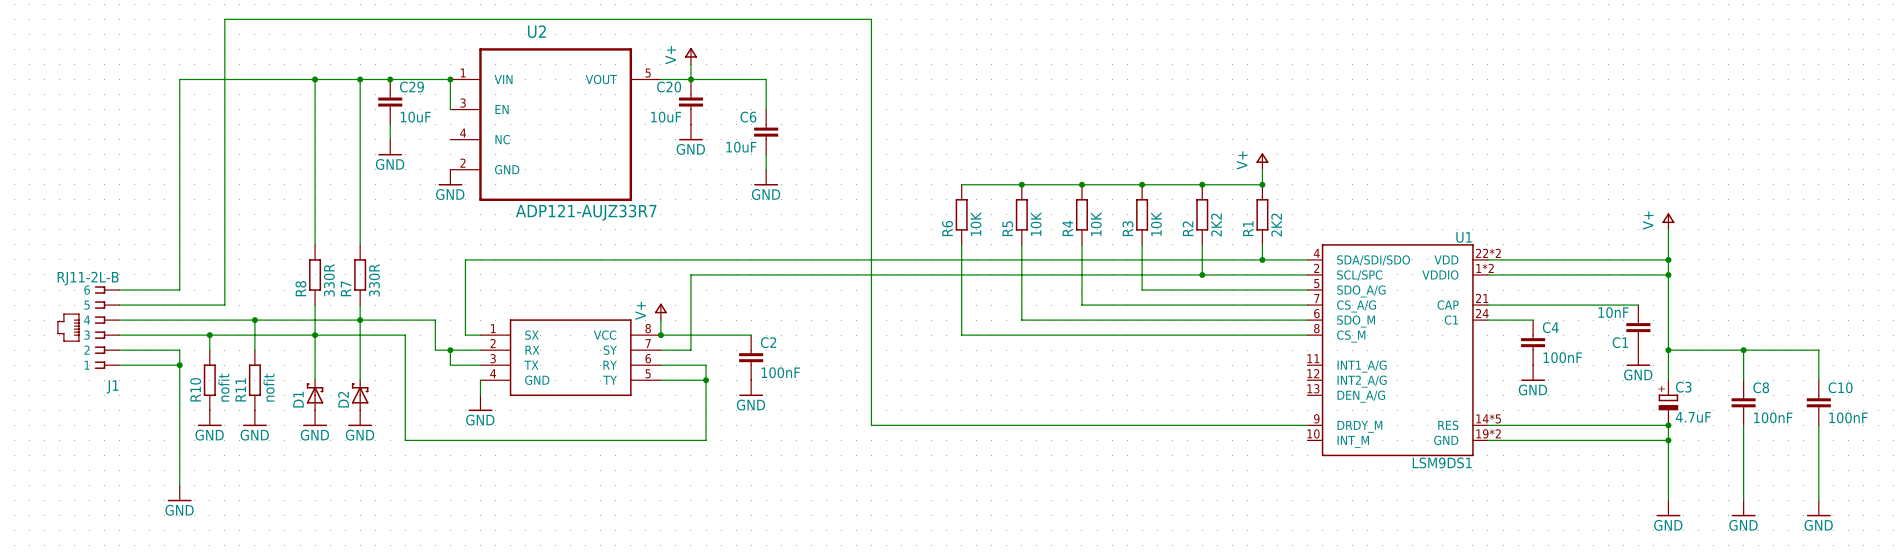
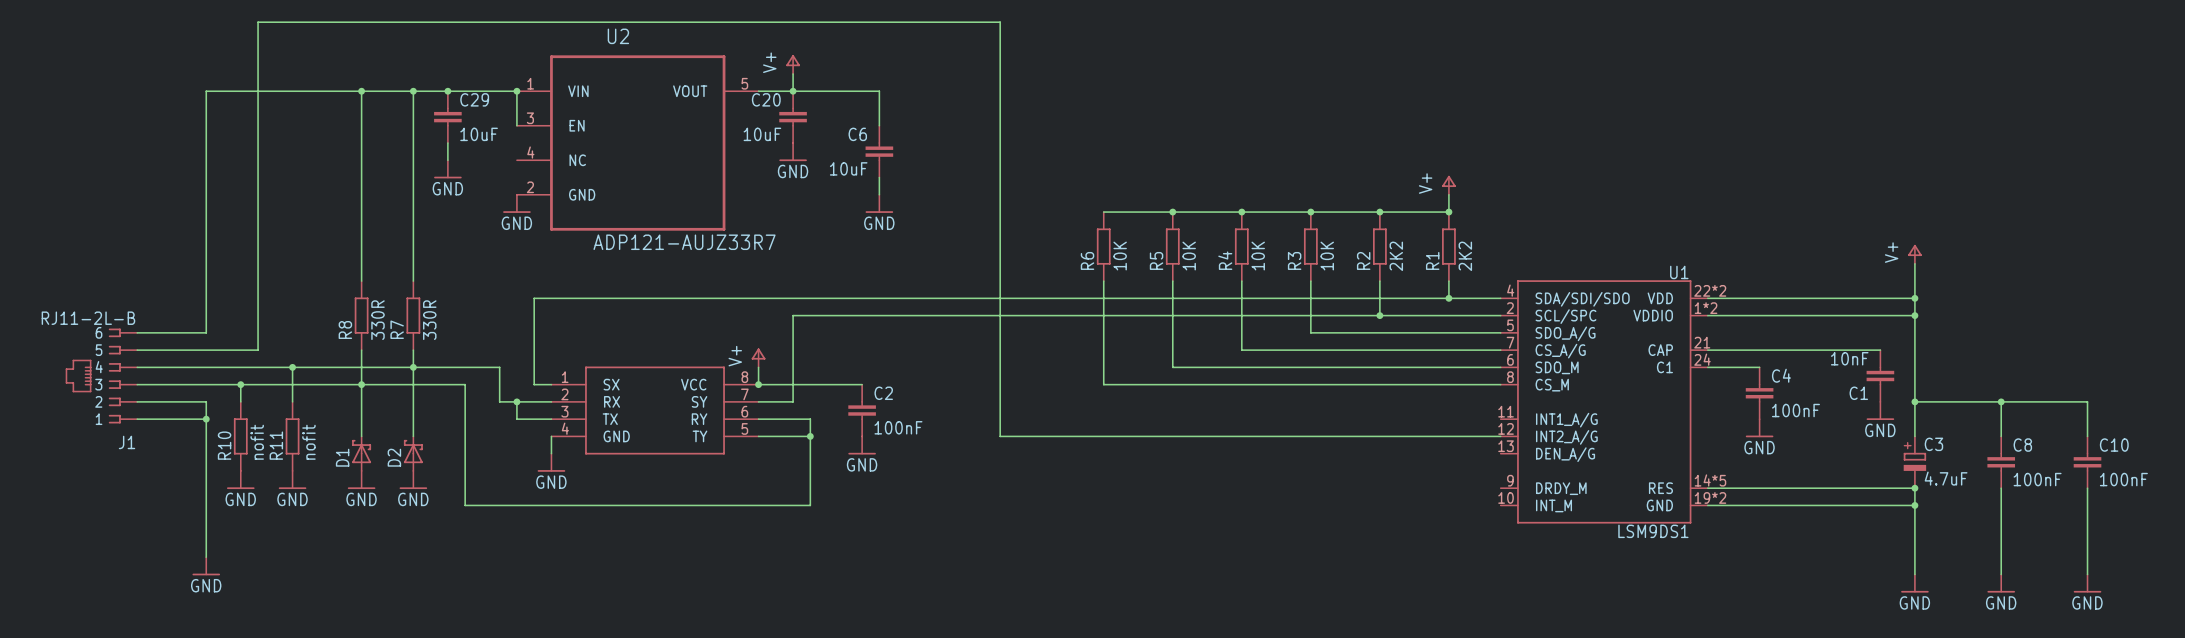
wire: (871, 380) (871, 425) (1307, 425) -> (1000, 436) (1500, 436)

